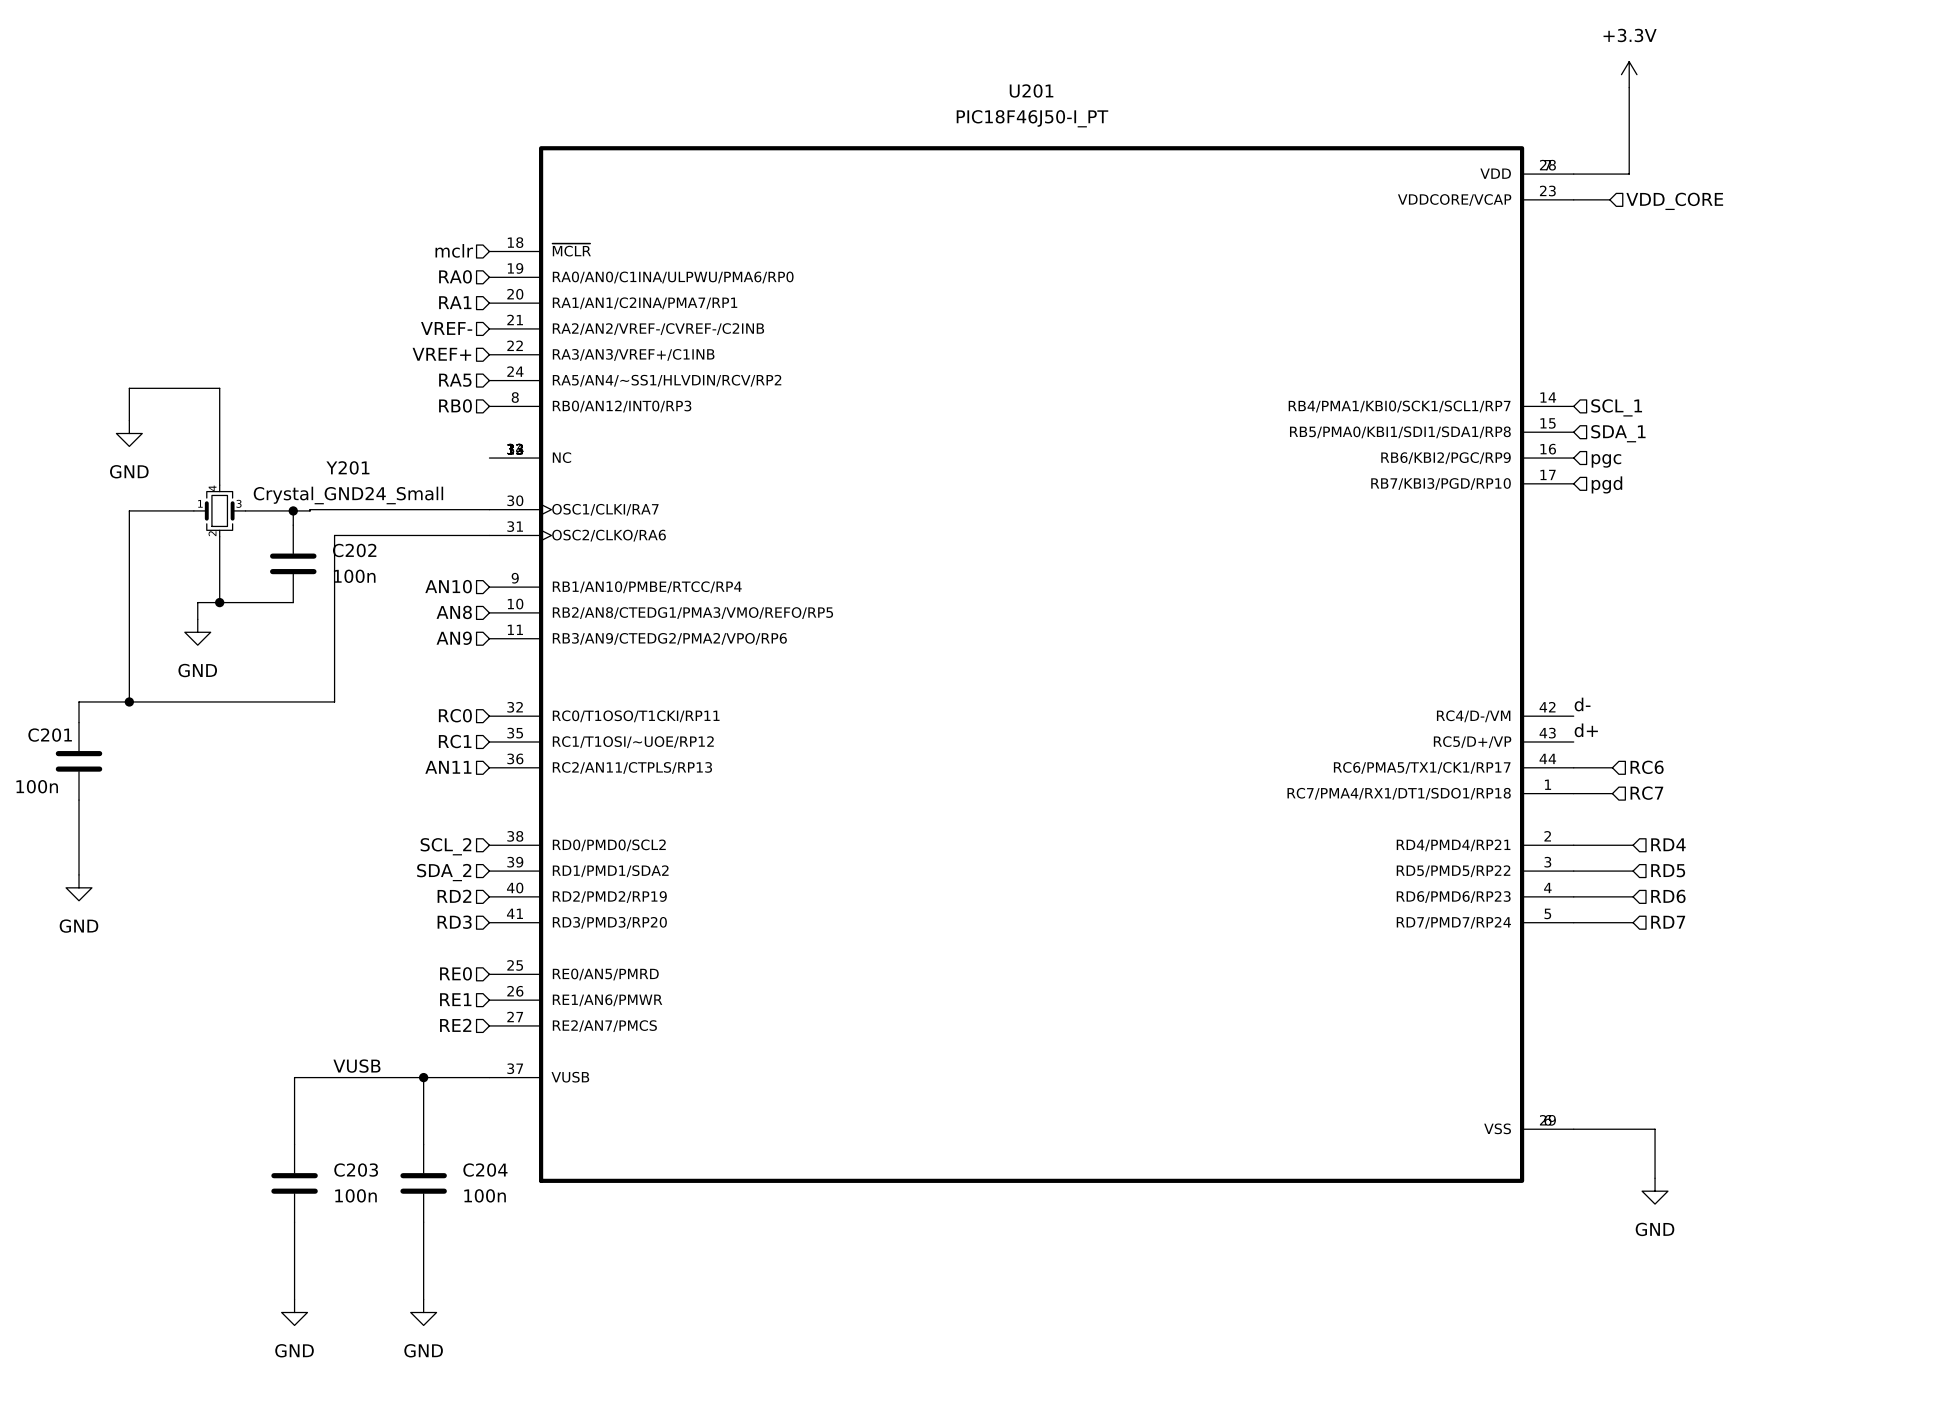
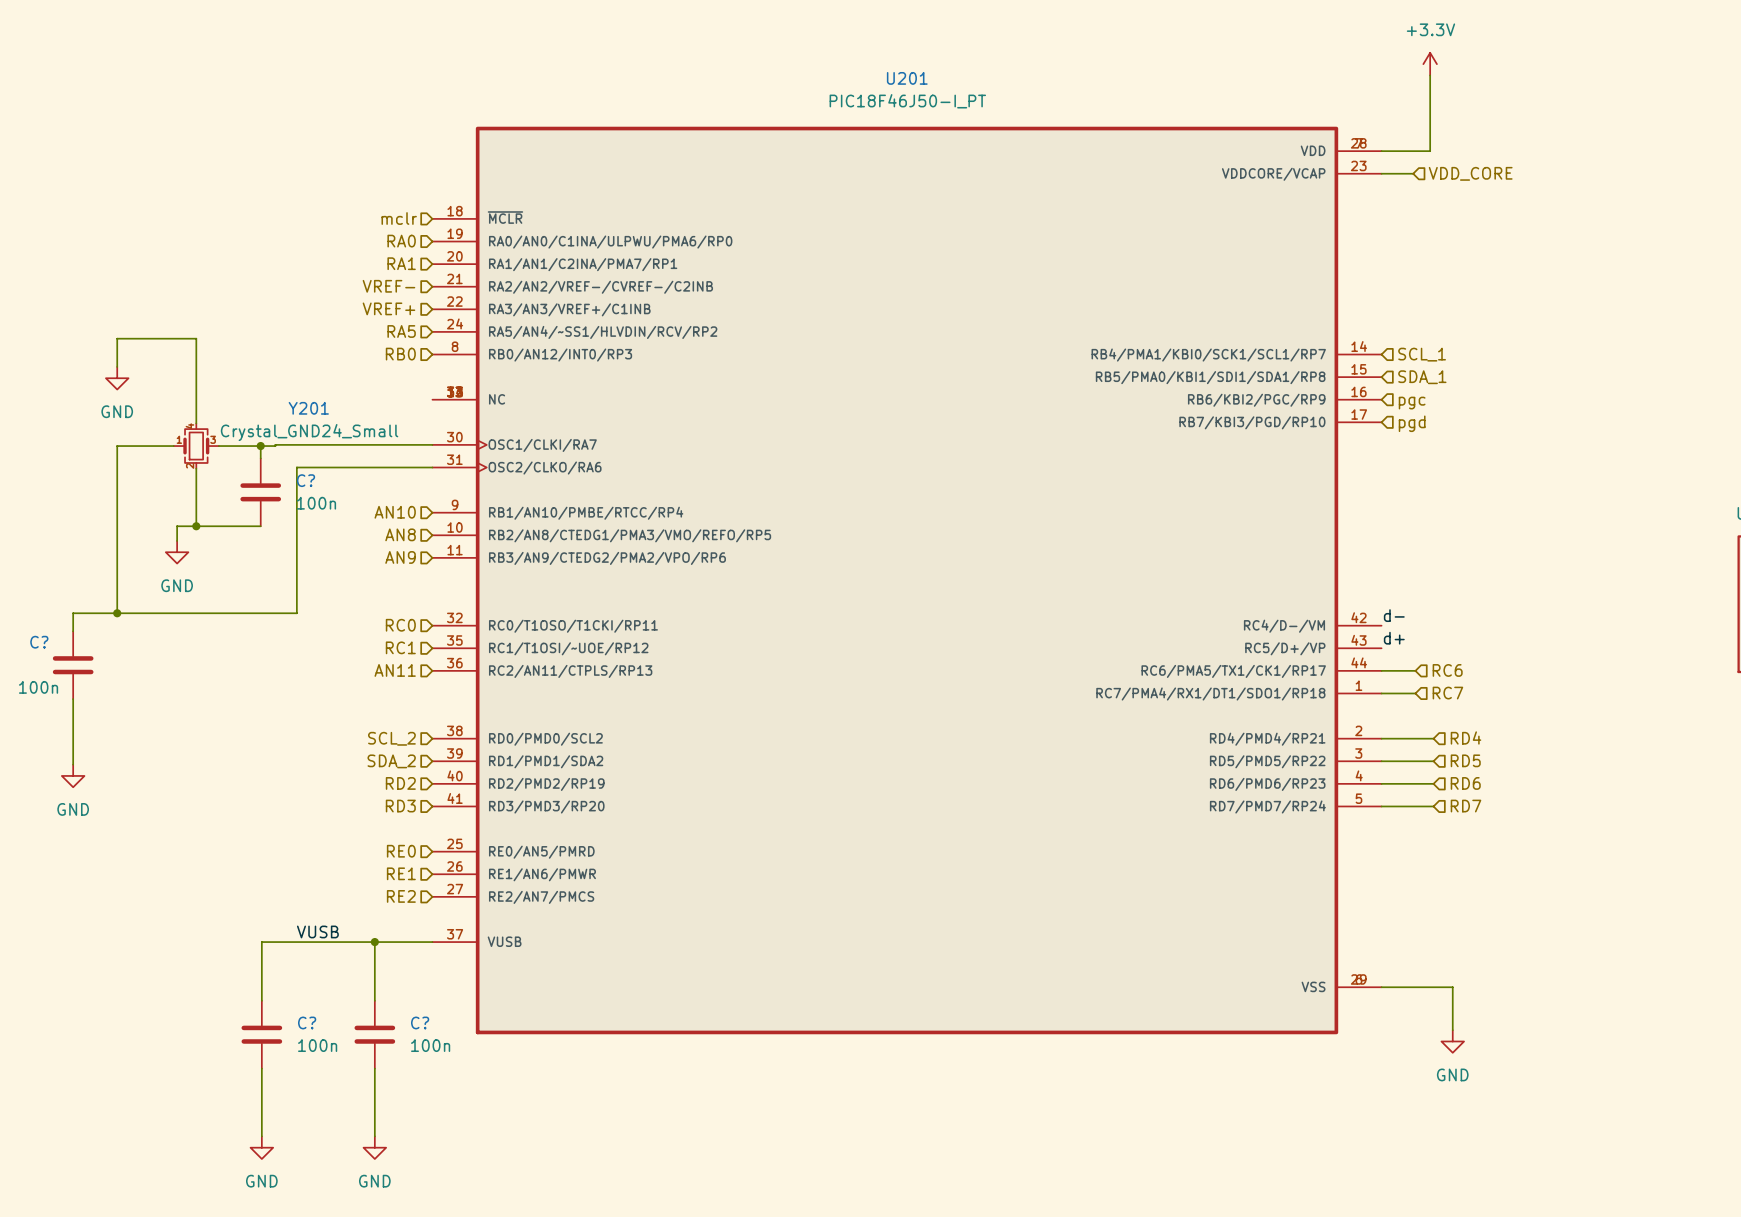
C202 name: C202 (354, 550) -> C? (306, 480)
C201 name: C201 (50, 735) -> C? (39, 642)
C203 name: C203 (356, 1170) -> C? (307, 1022)
C204 name: C204 (485, 1170) -> C? (420, 1022)

